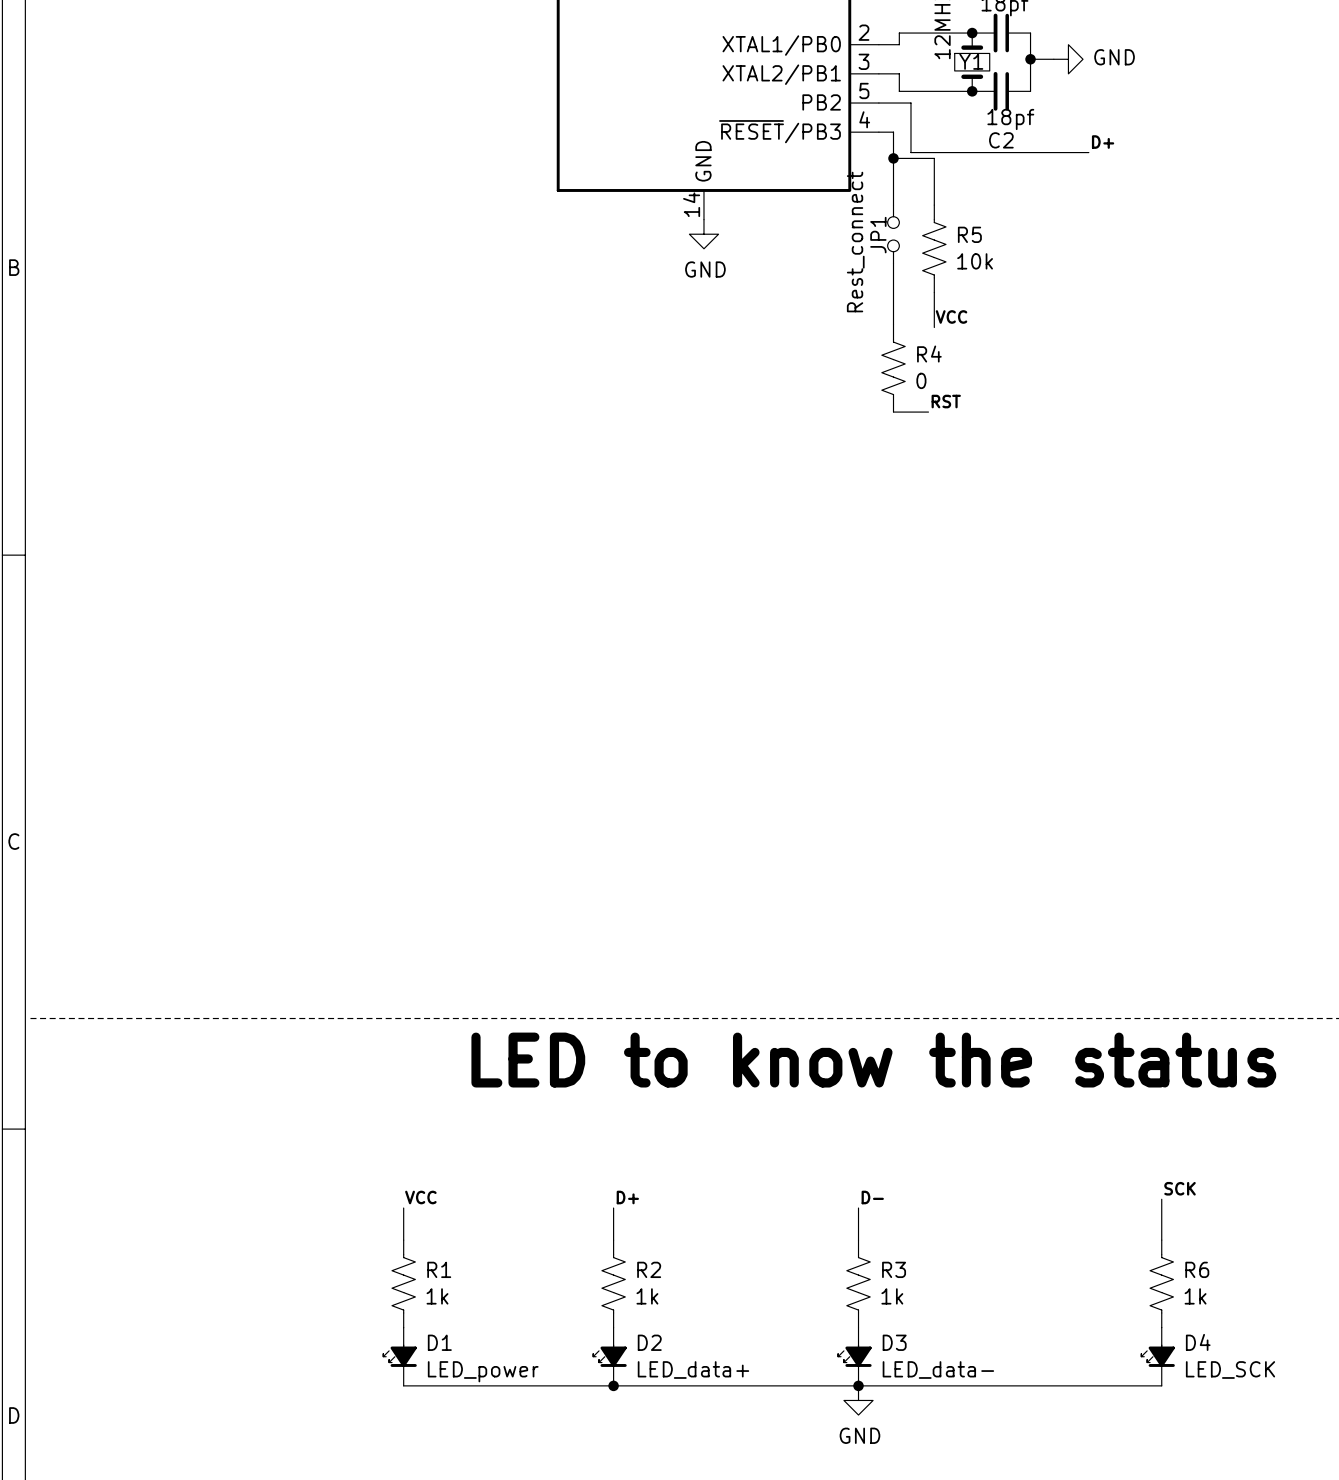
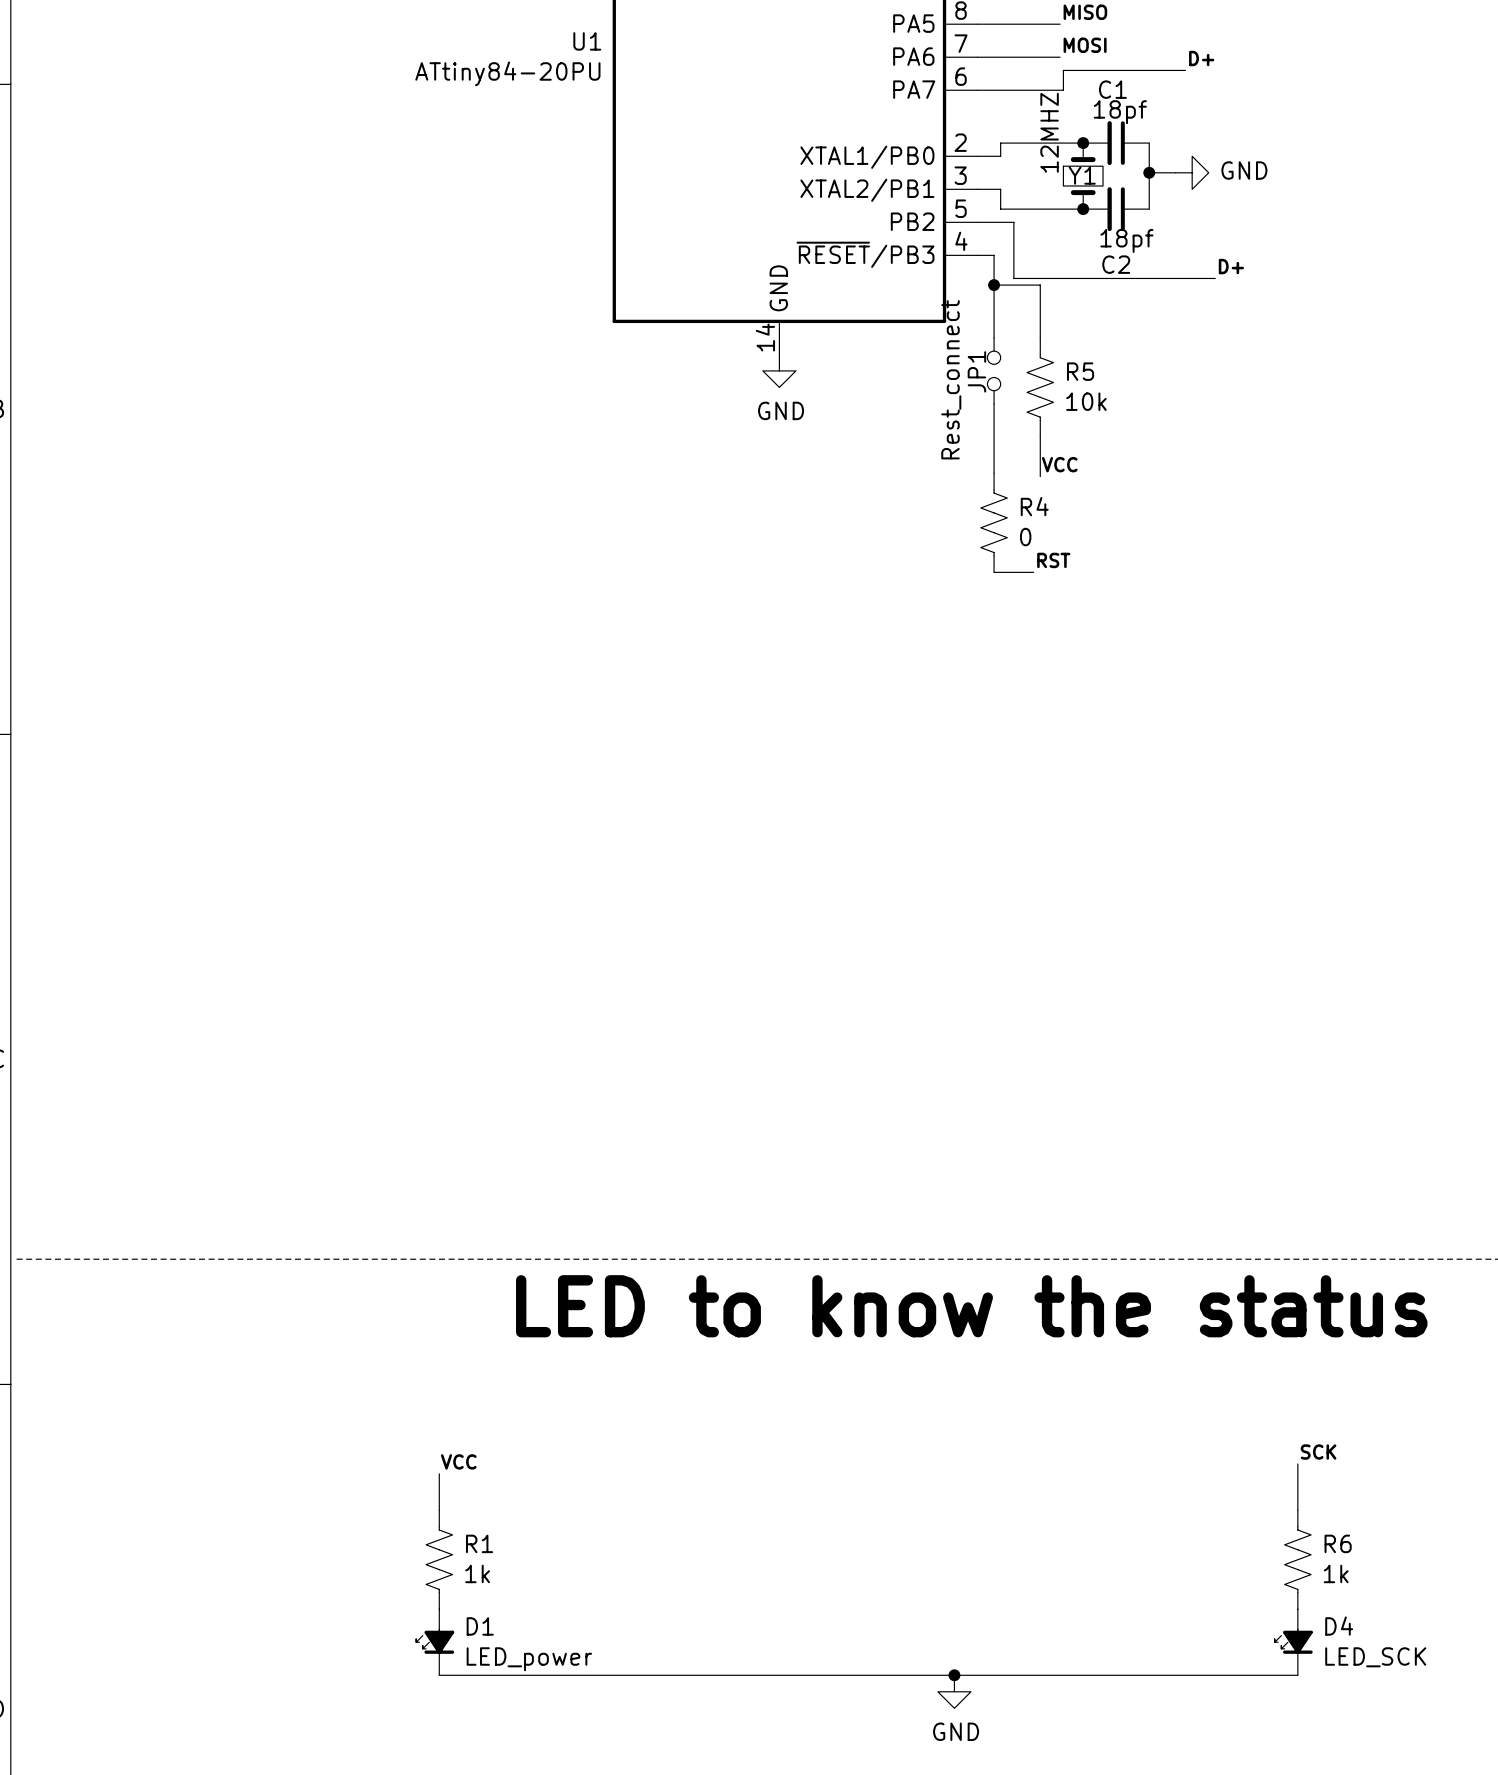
label: D+ (627, 1197) -> none
label: D- (872, 1197) -> none
wire: (613, 1208) (613, 1240) -> none
wire: (858, 1208) (858, 1240) -> none
R2: 1k (613, 1283) -> none
R3: 1k (858, 1283) -> none
D2: LED_data+ (609, 1356) -> none
D3: LED_data- (854, 1356) -> none
junction: (613, 1385) -> none

